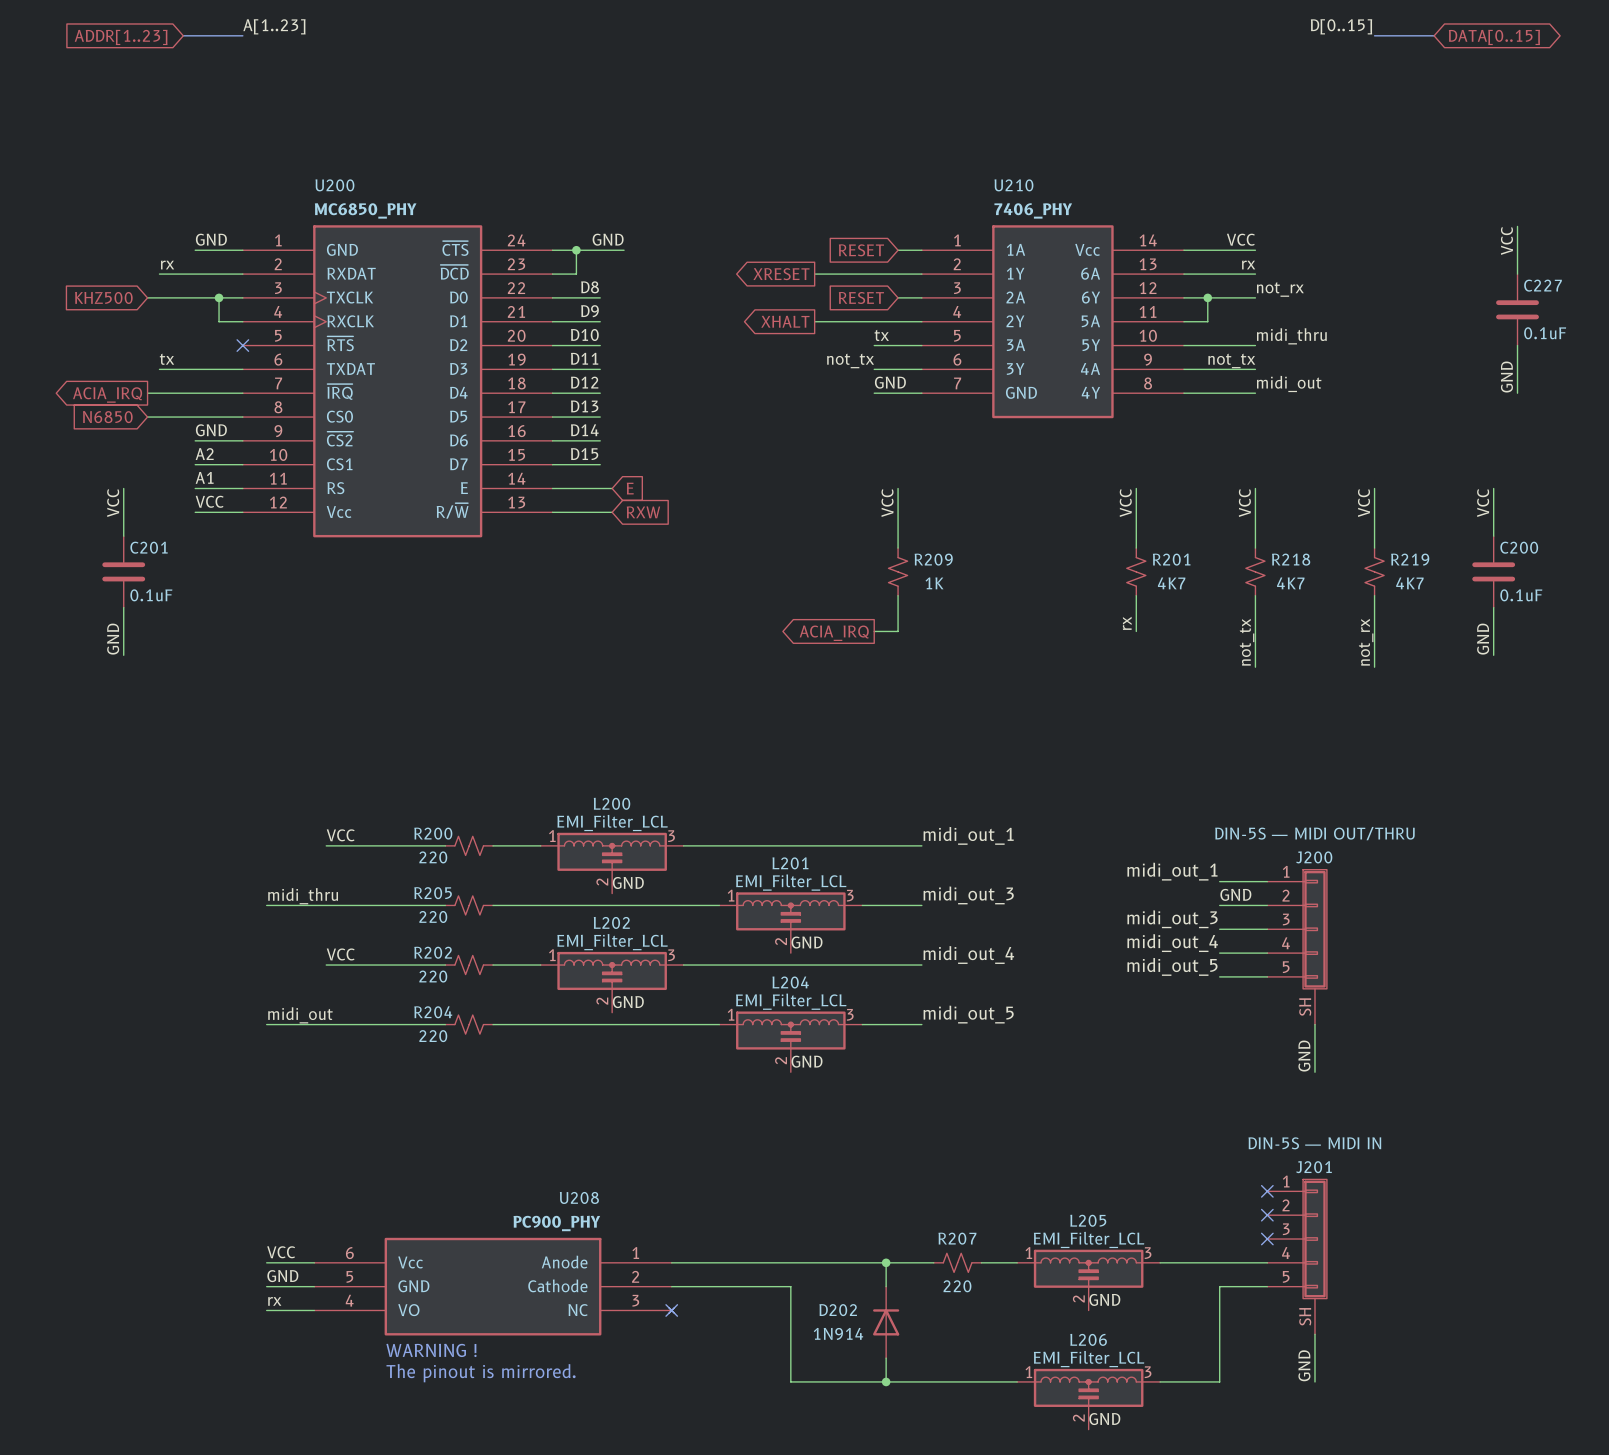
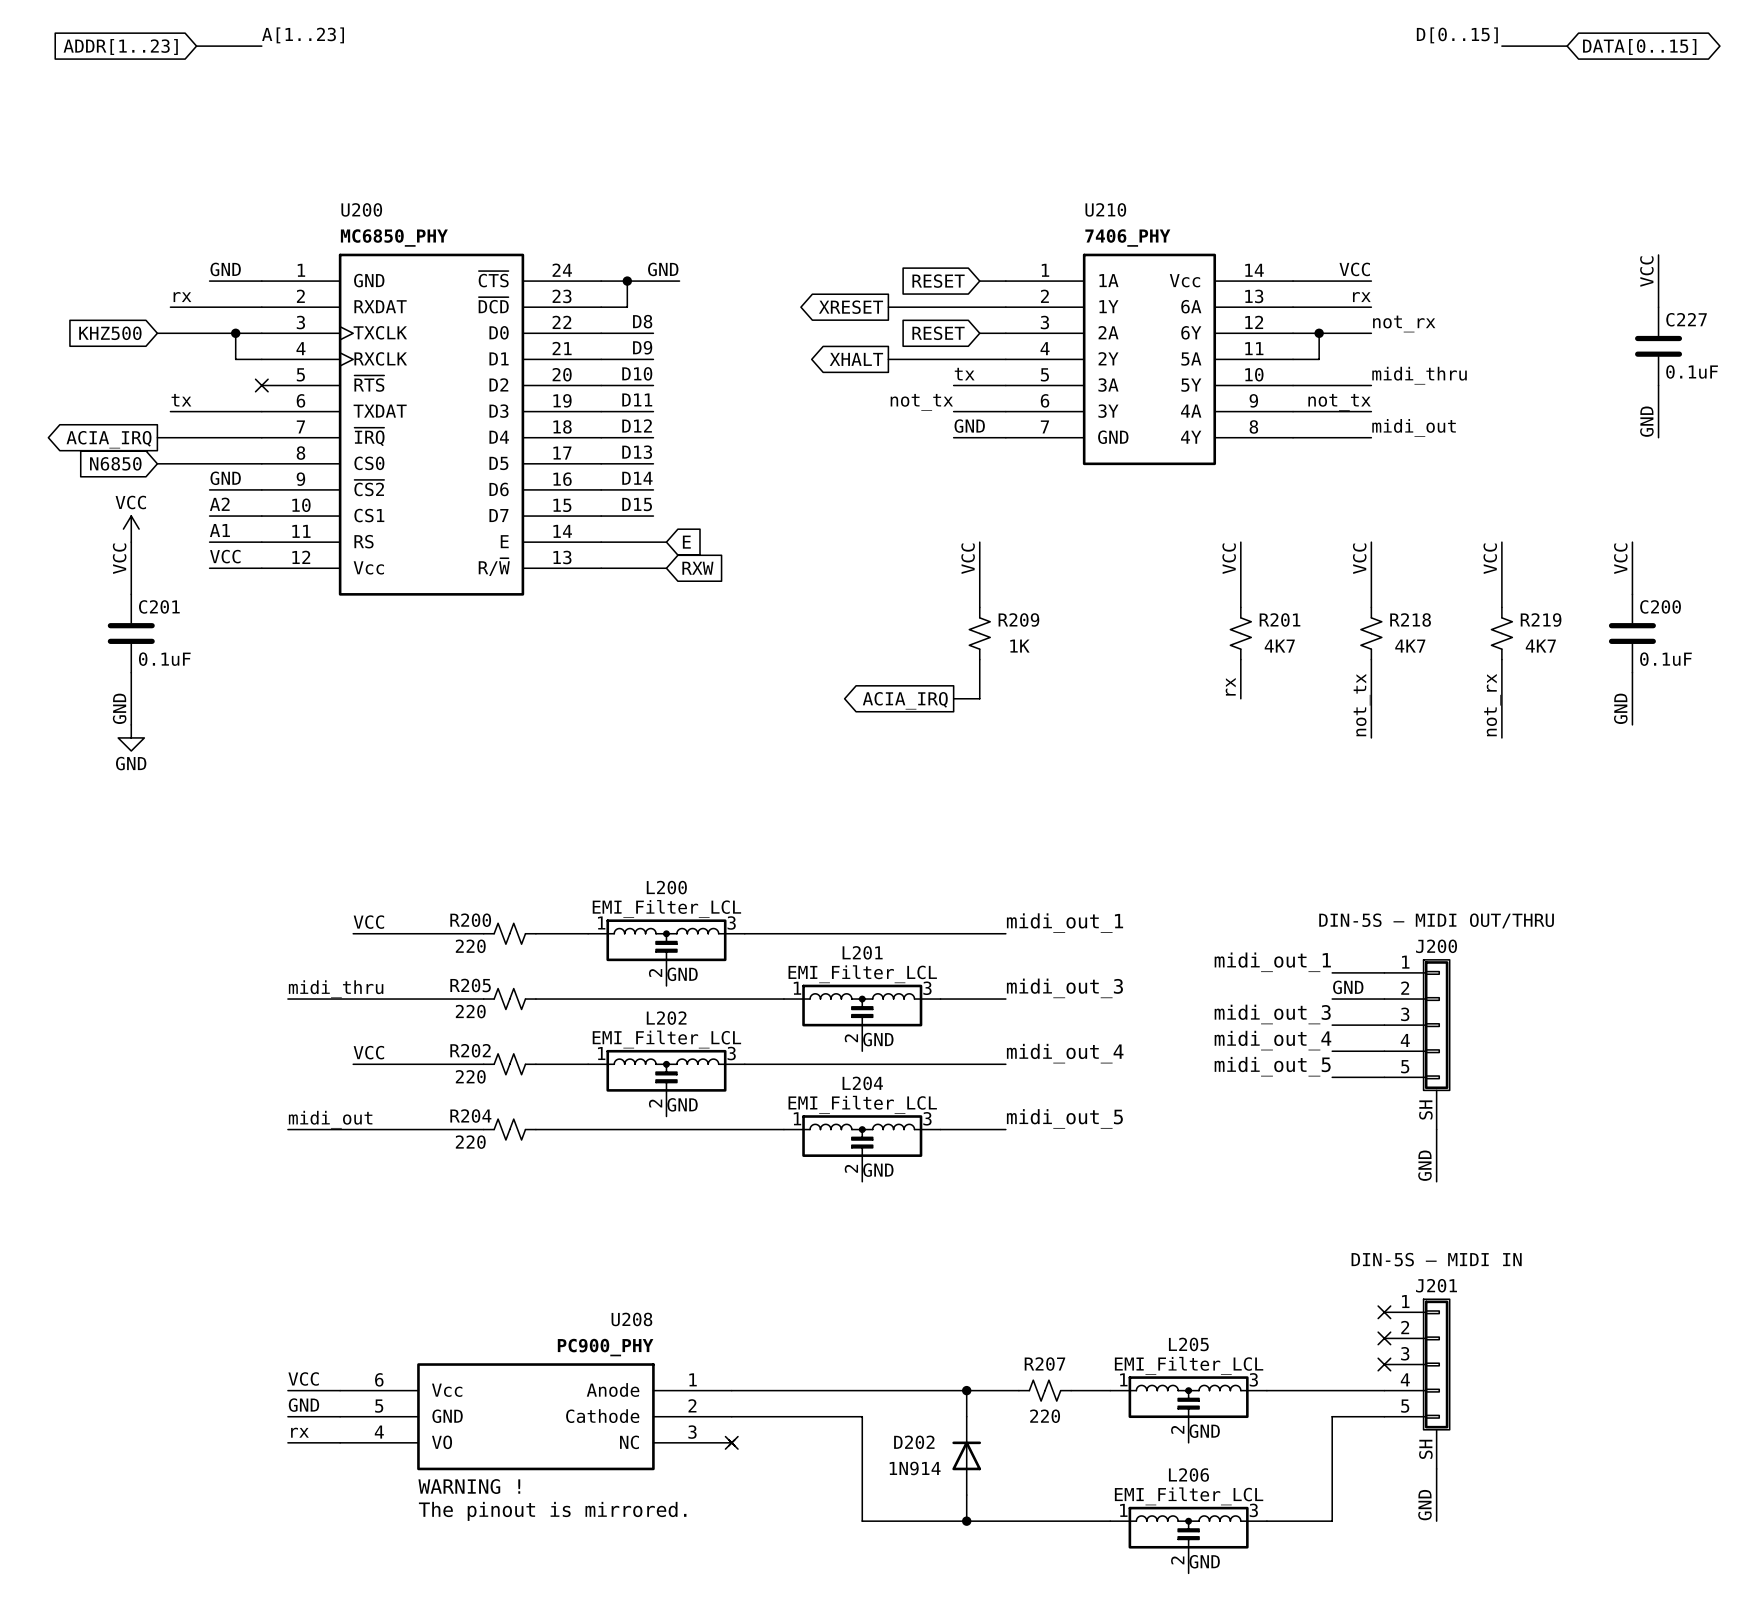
power symbol: none -> VCC (131, 529)
power symbol: none -> GND (131, 737)

